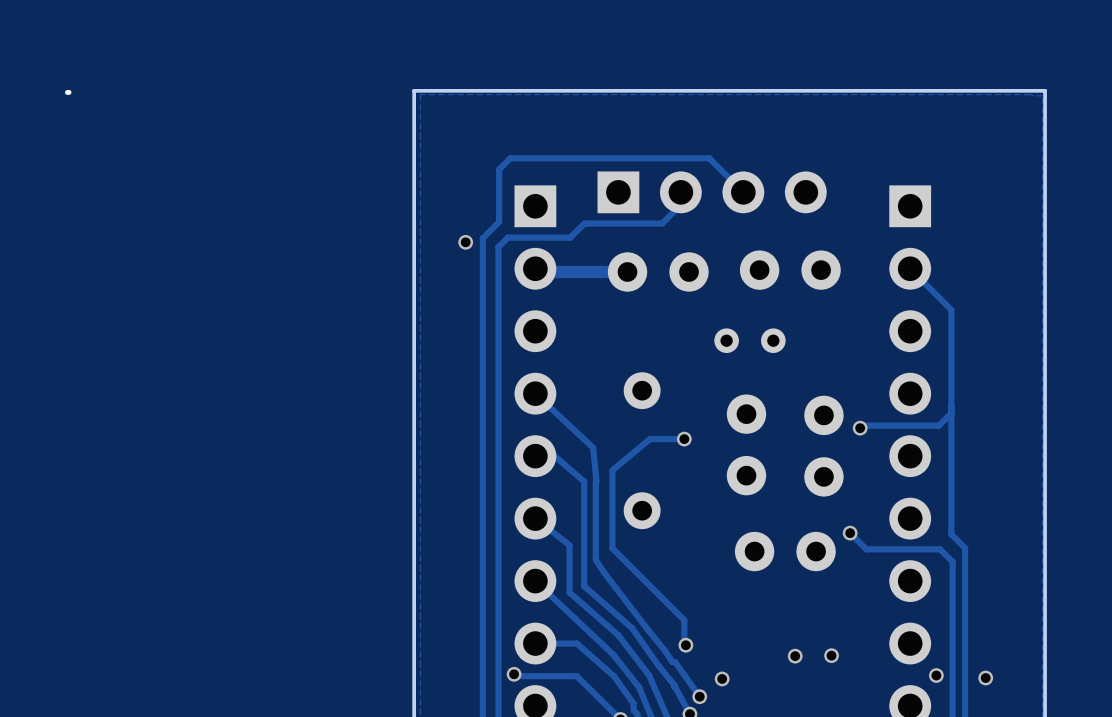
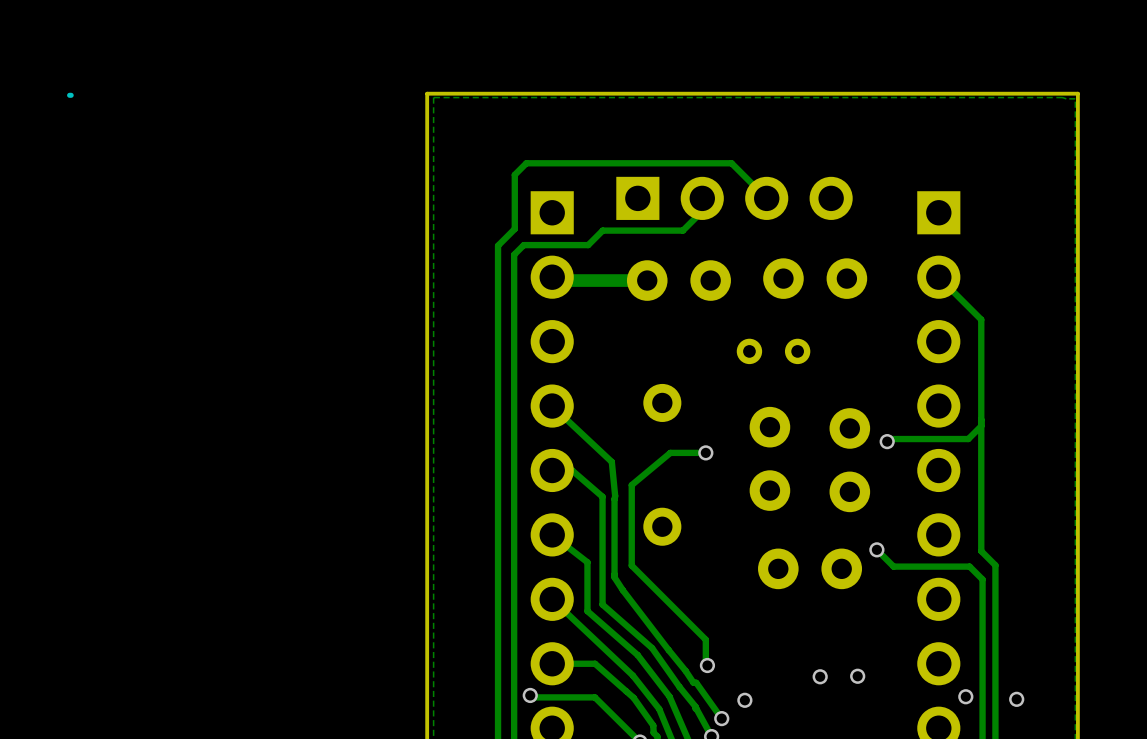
via: (465, 242) -> none

